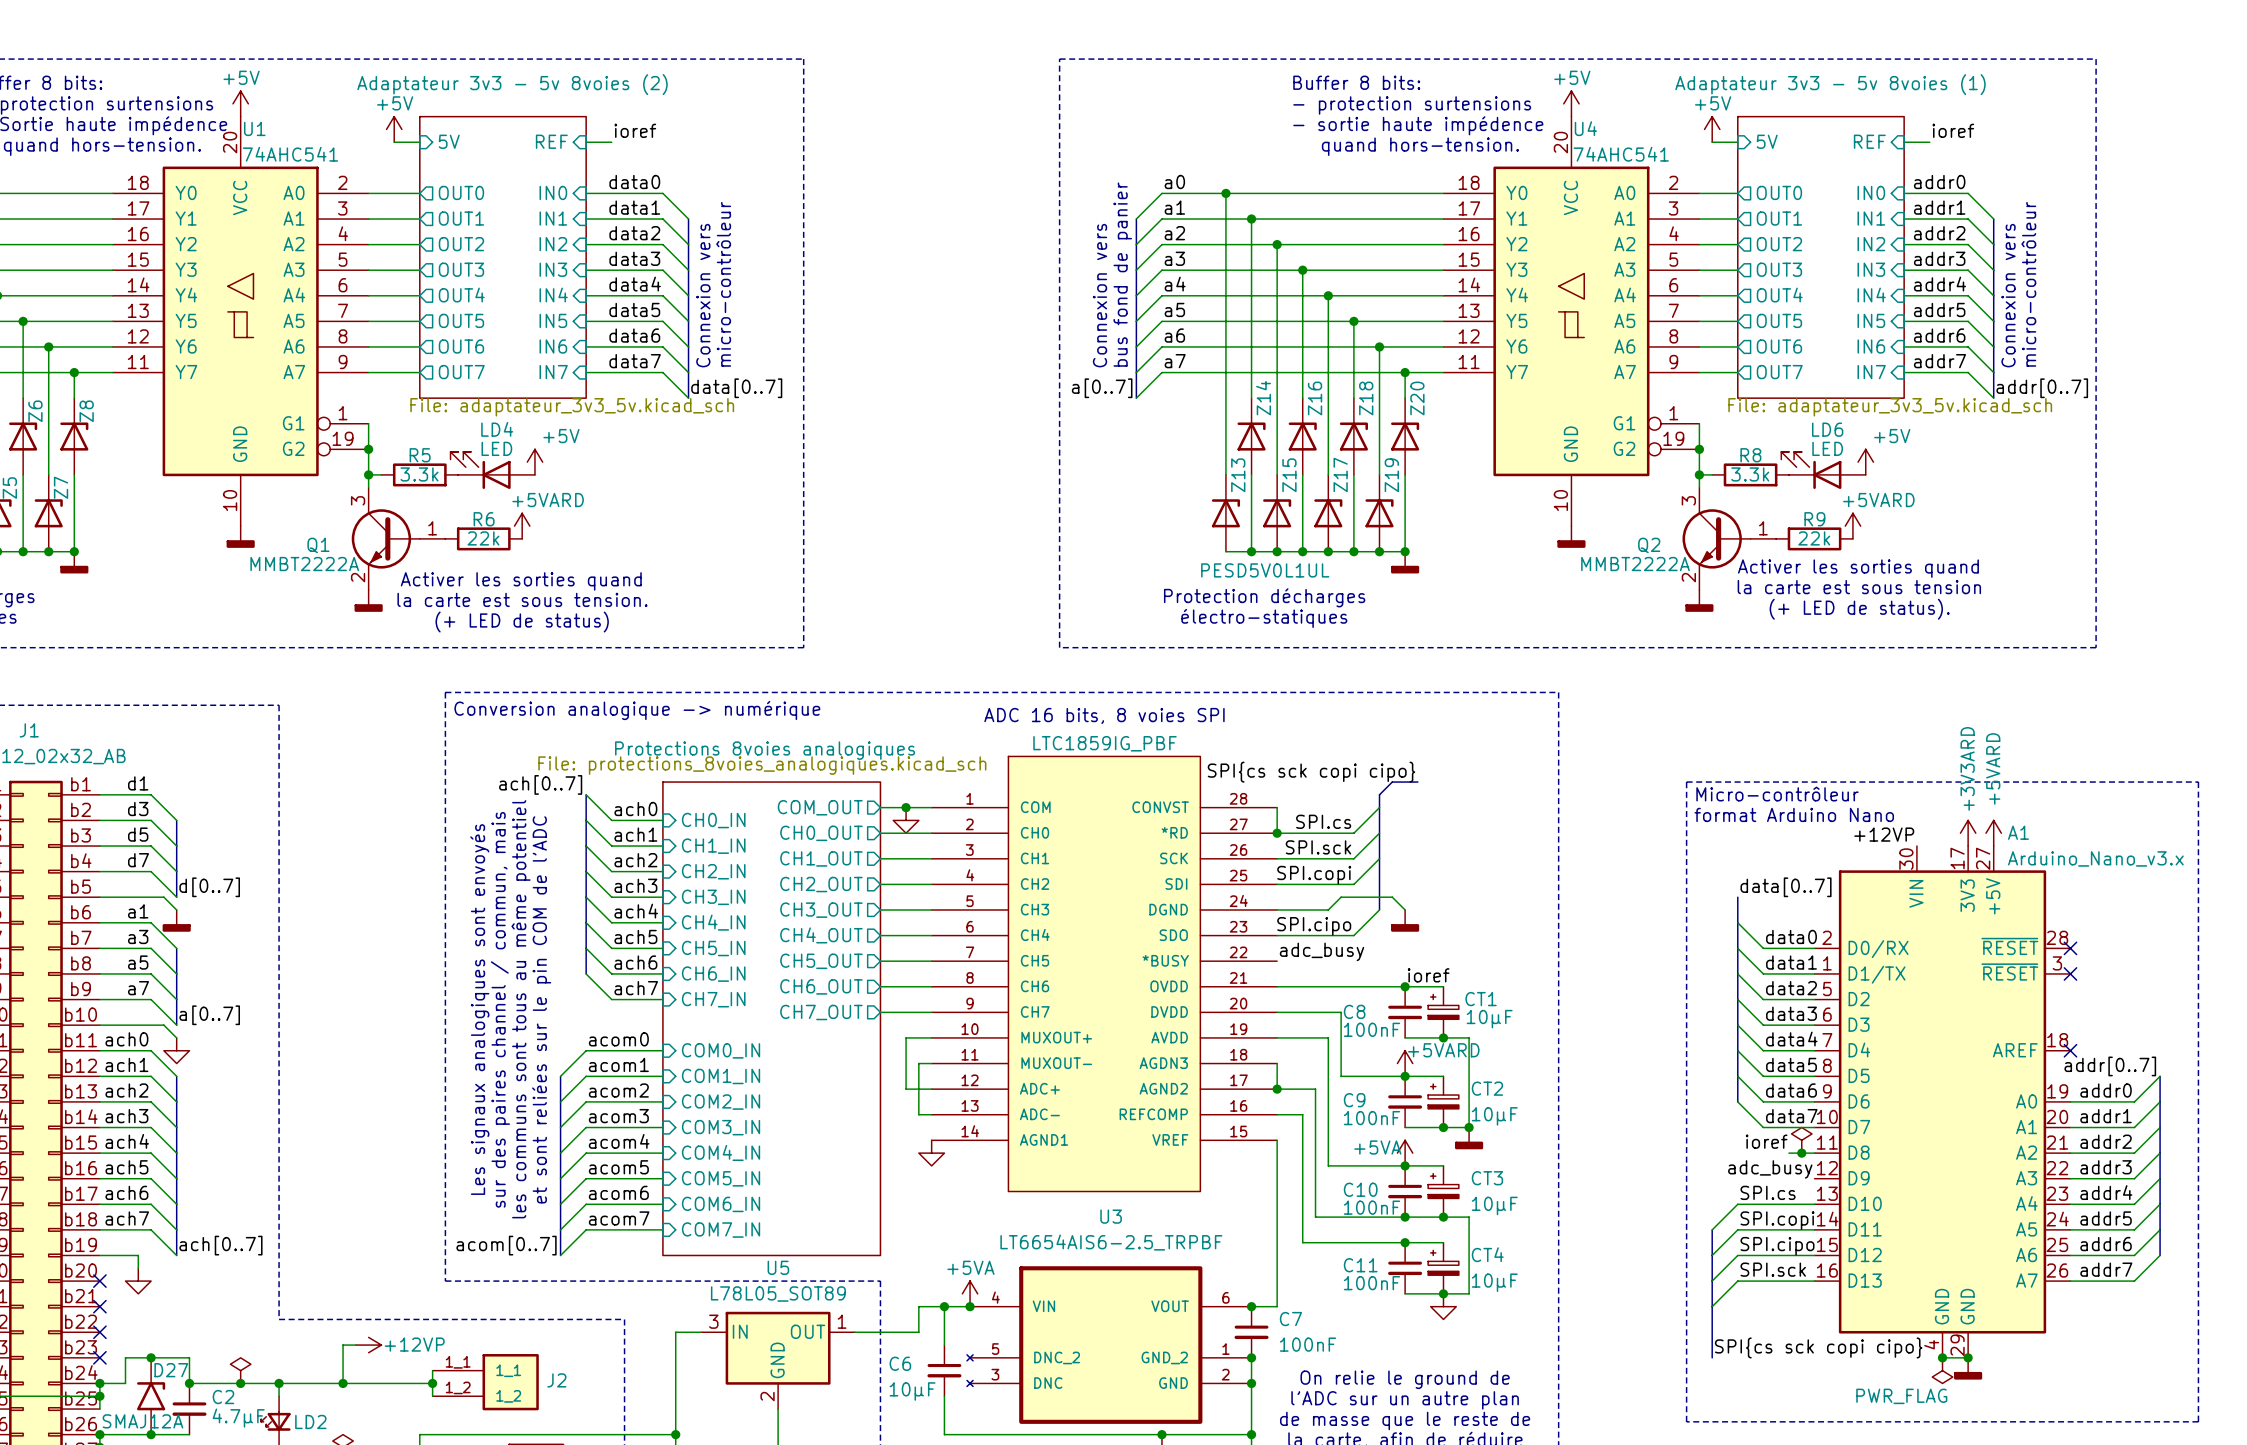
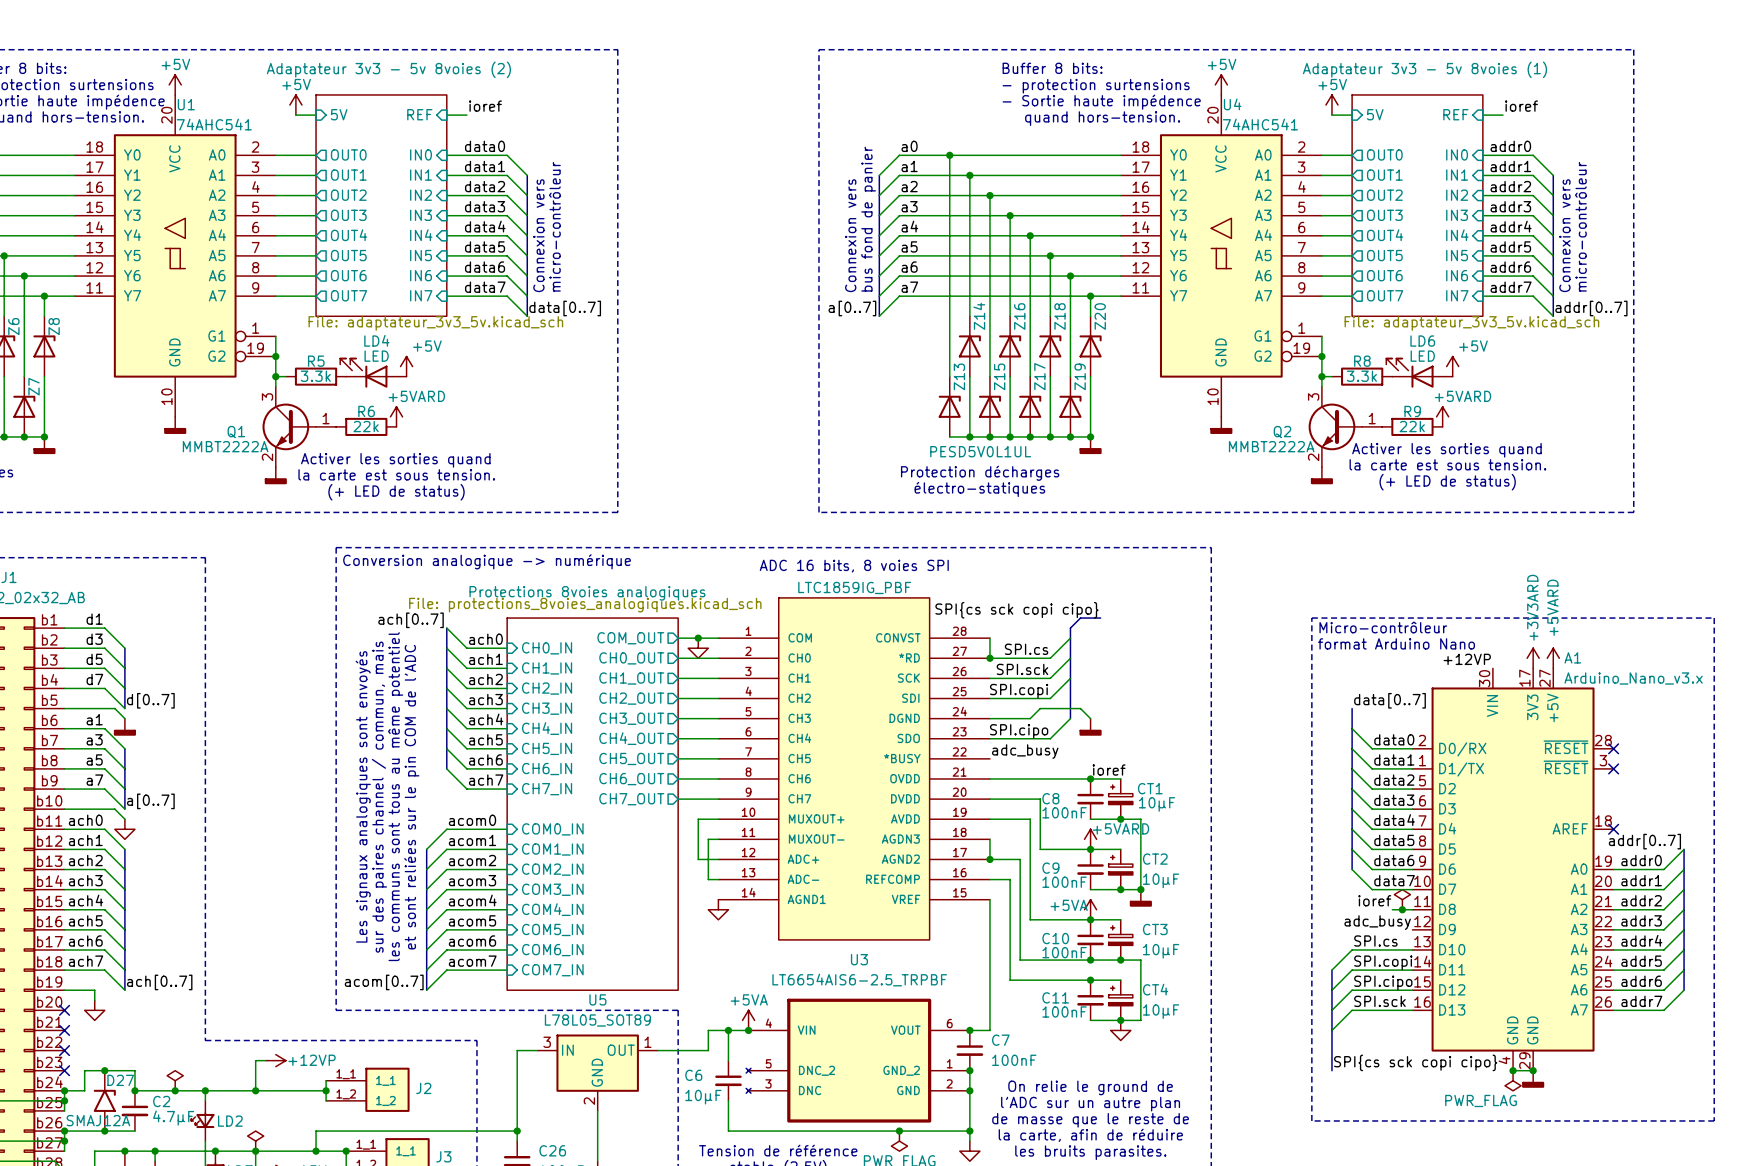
text: - sortie haute impédence (1418, 125) -> - Sortie haute impédence (1101, 102)
text: la carte est sous tension (1859, 587) -> la carte est sous tension. (1447, 464)
text: (+ LED de status). (1859, 609) -> (+ LED de status) (1447, 482)

